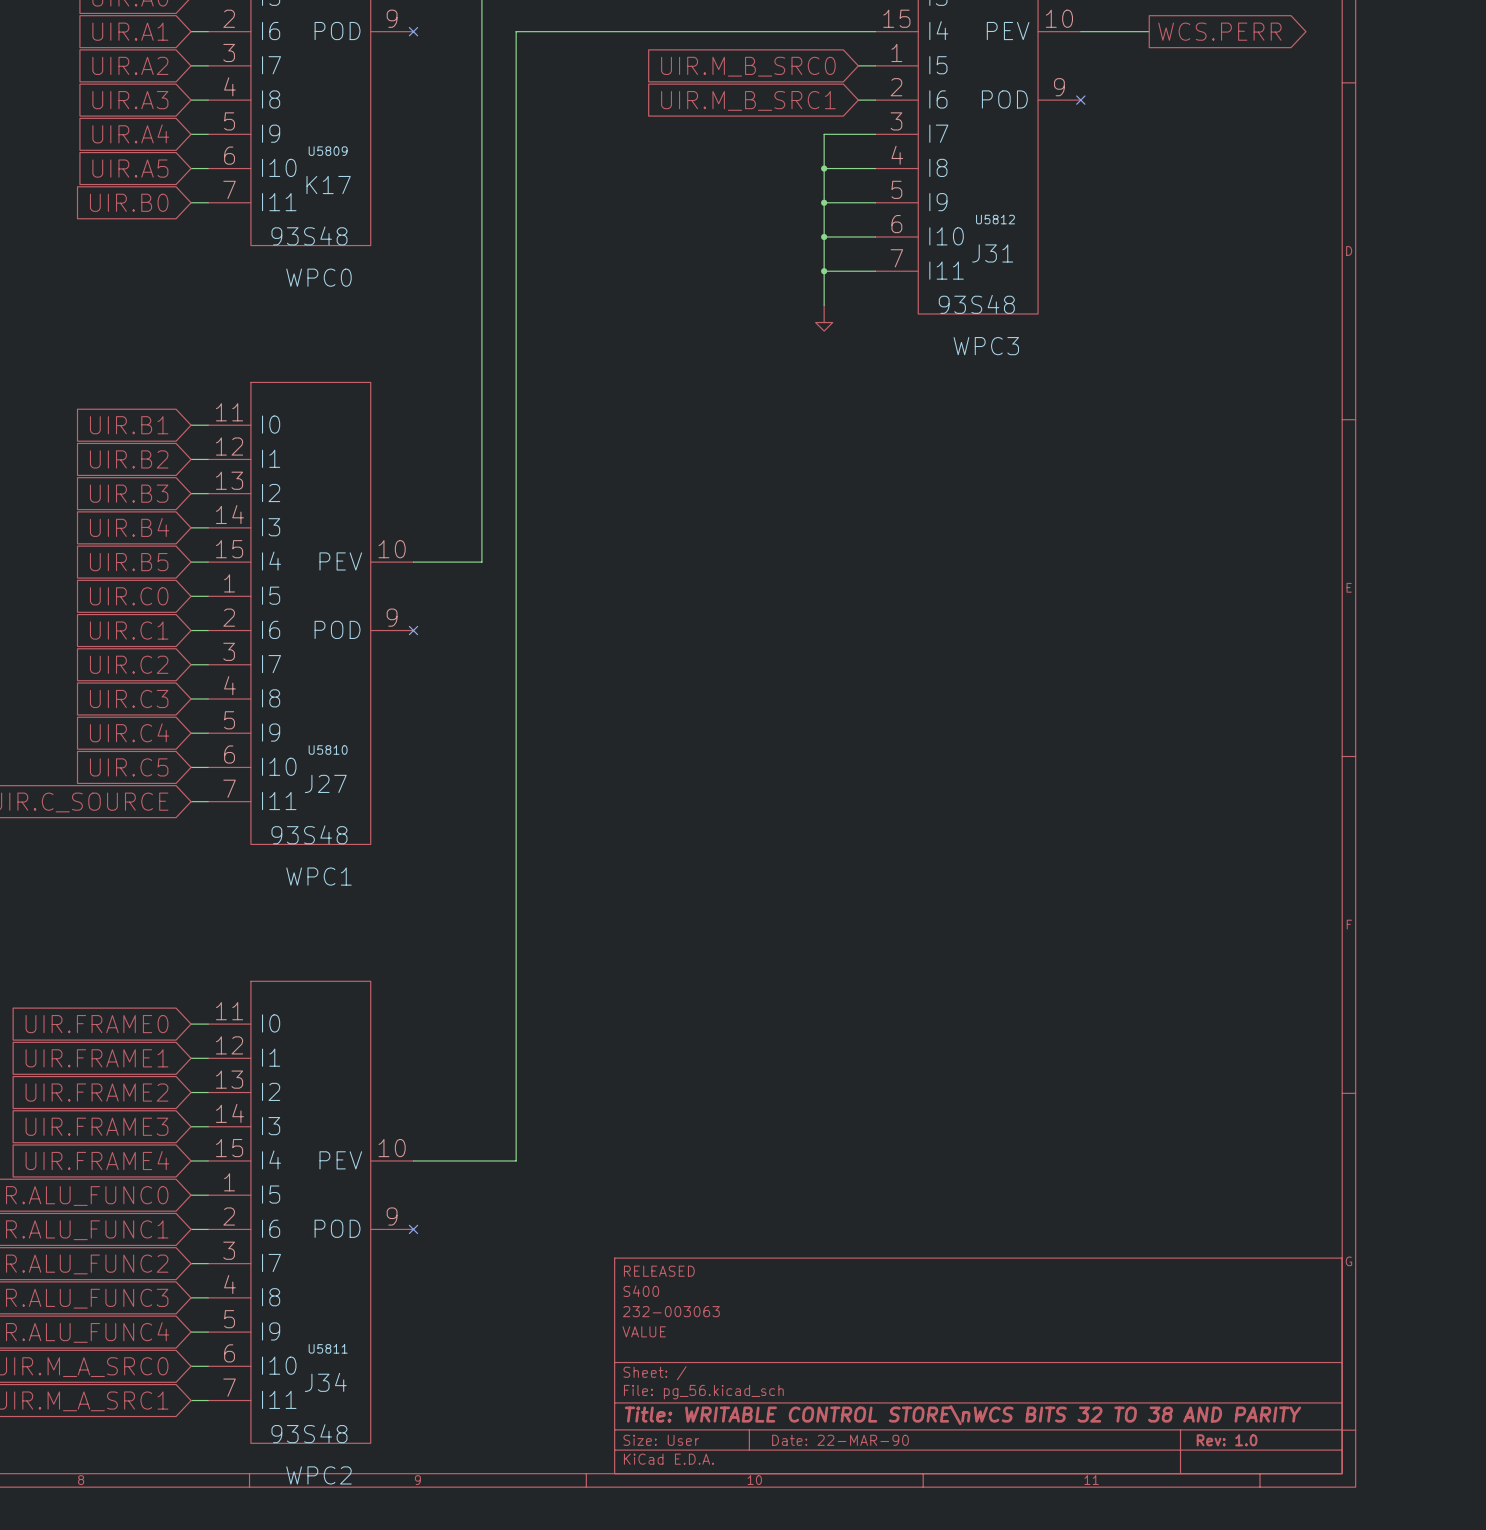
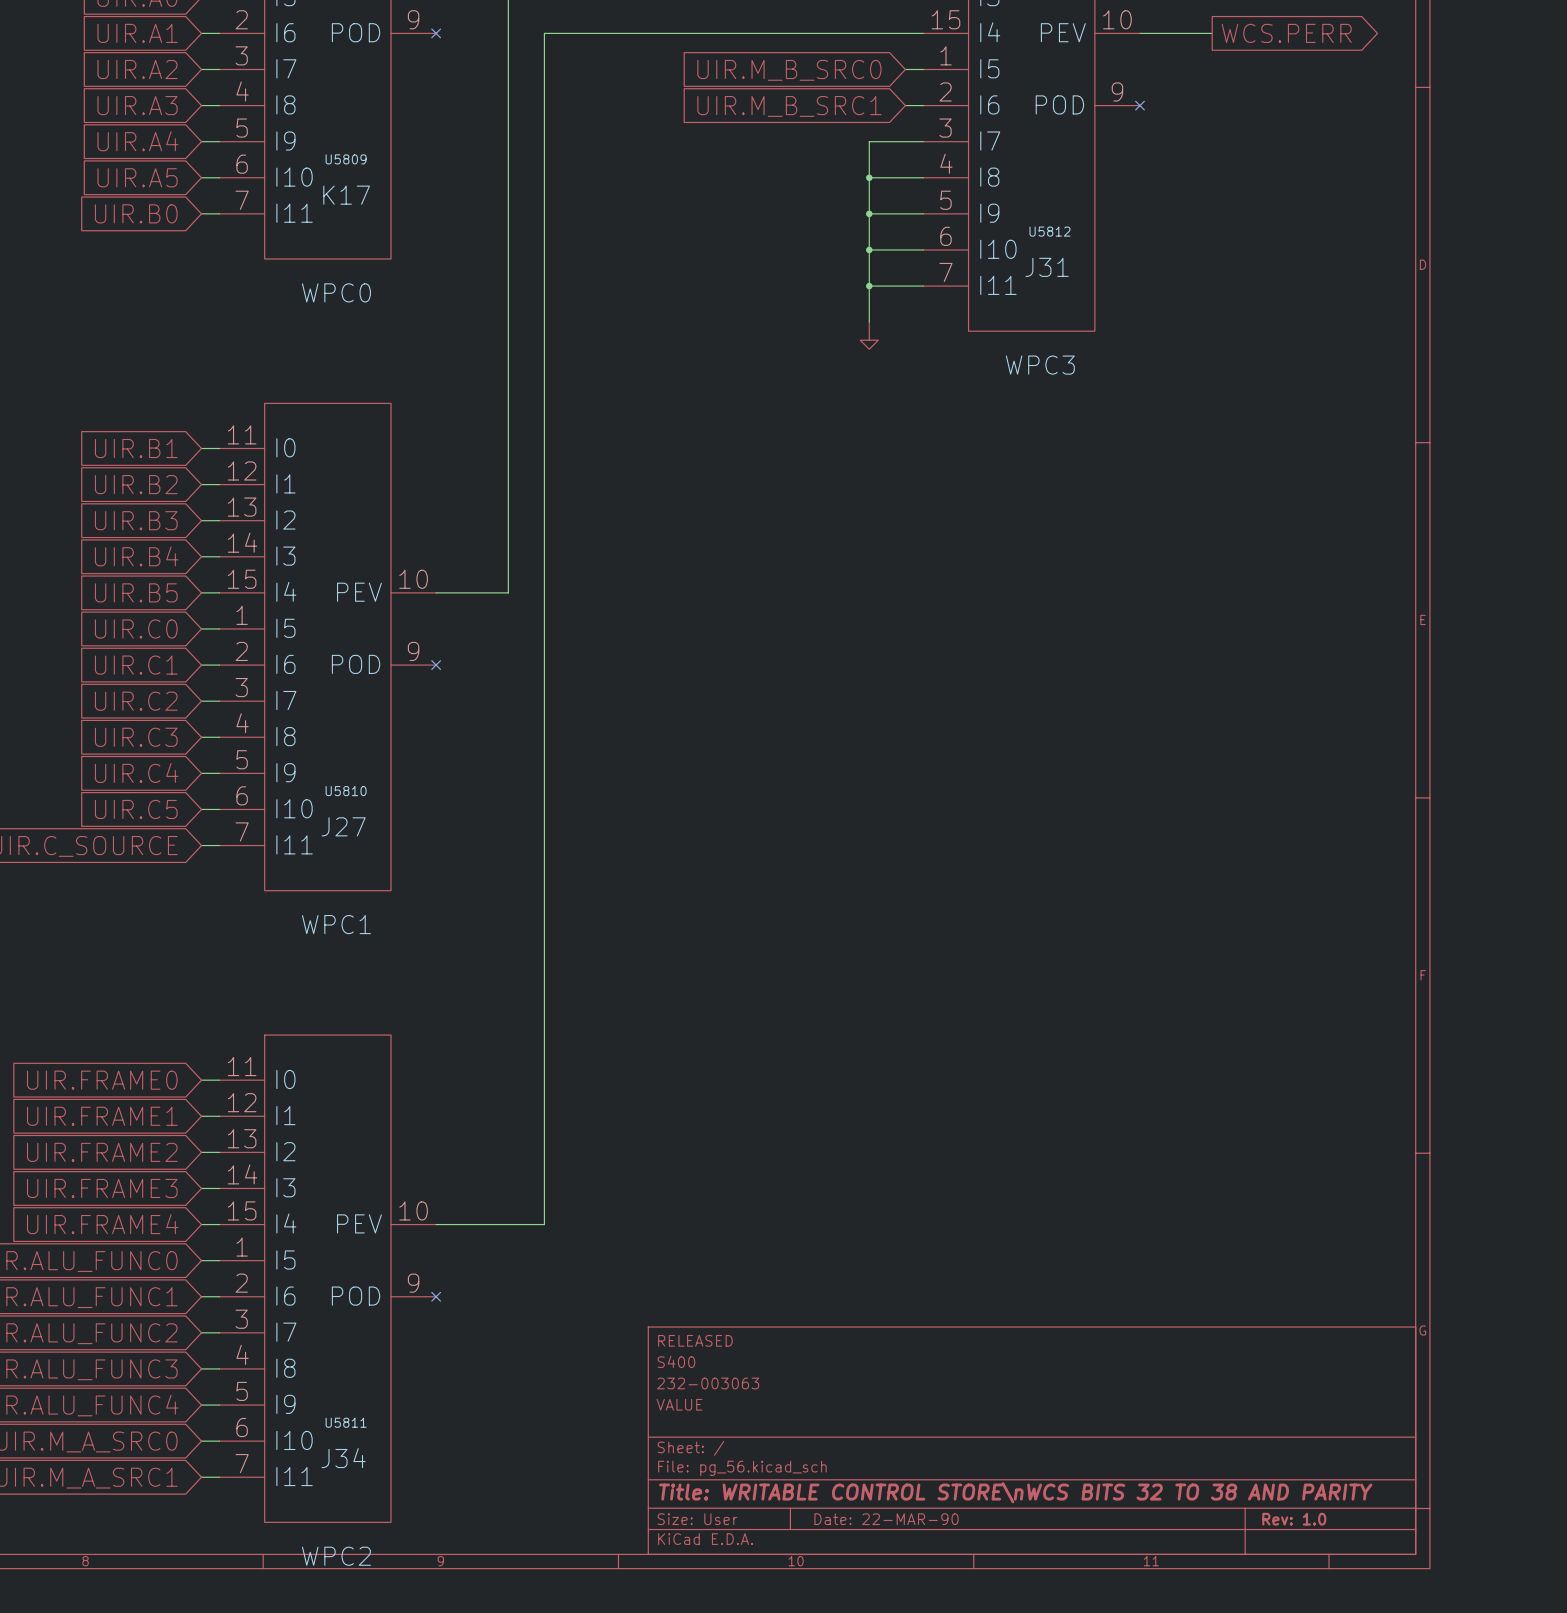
U5809 value: 93S48 (309, 235) -> none
U5812 value: 93S48 (976, 304) -> none
U5810 value: 93S48 (309, 834) -> none
U5811 value: 93S48 (309, 1433) -> none

